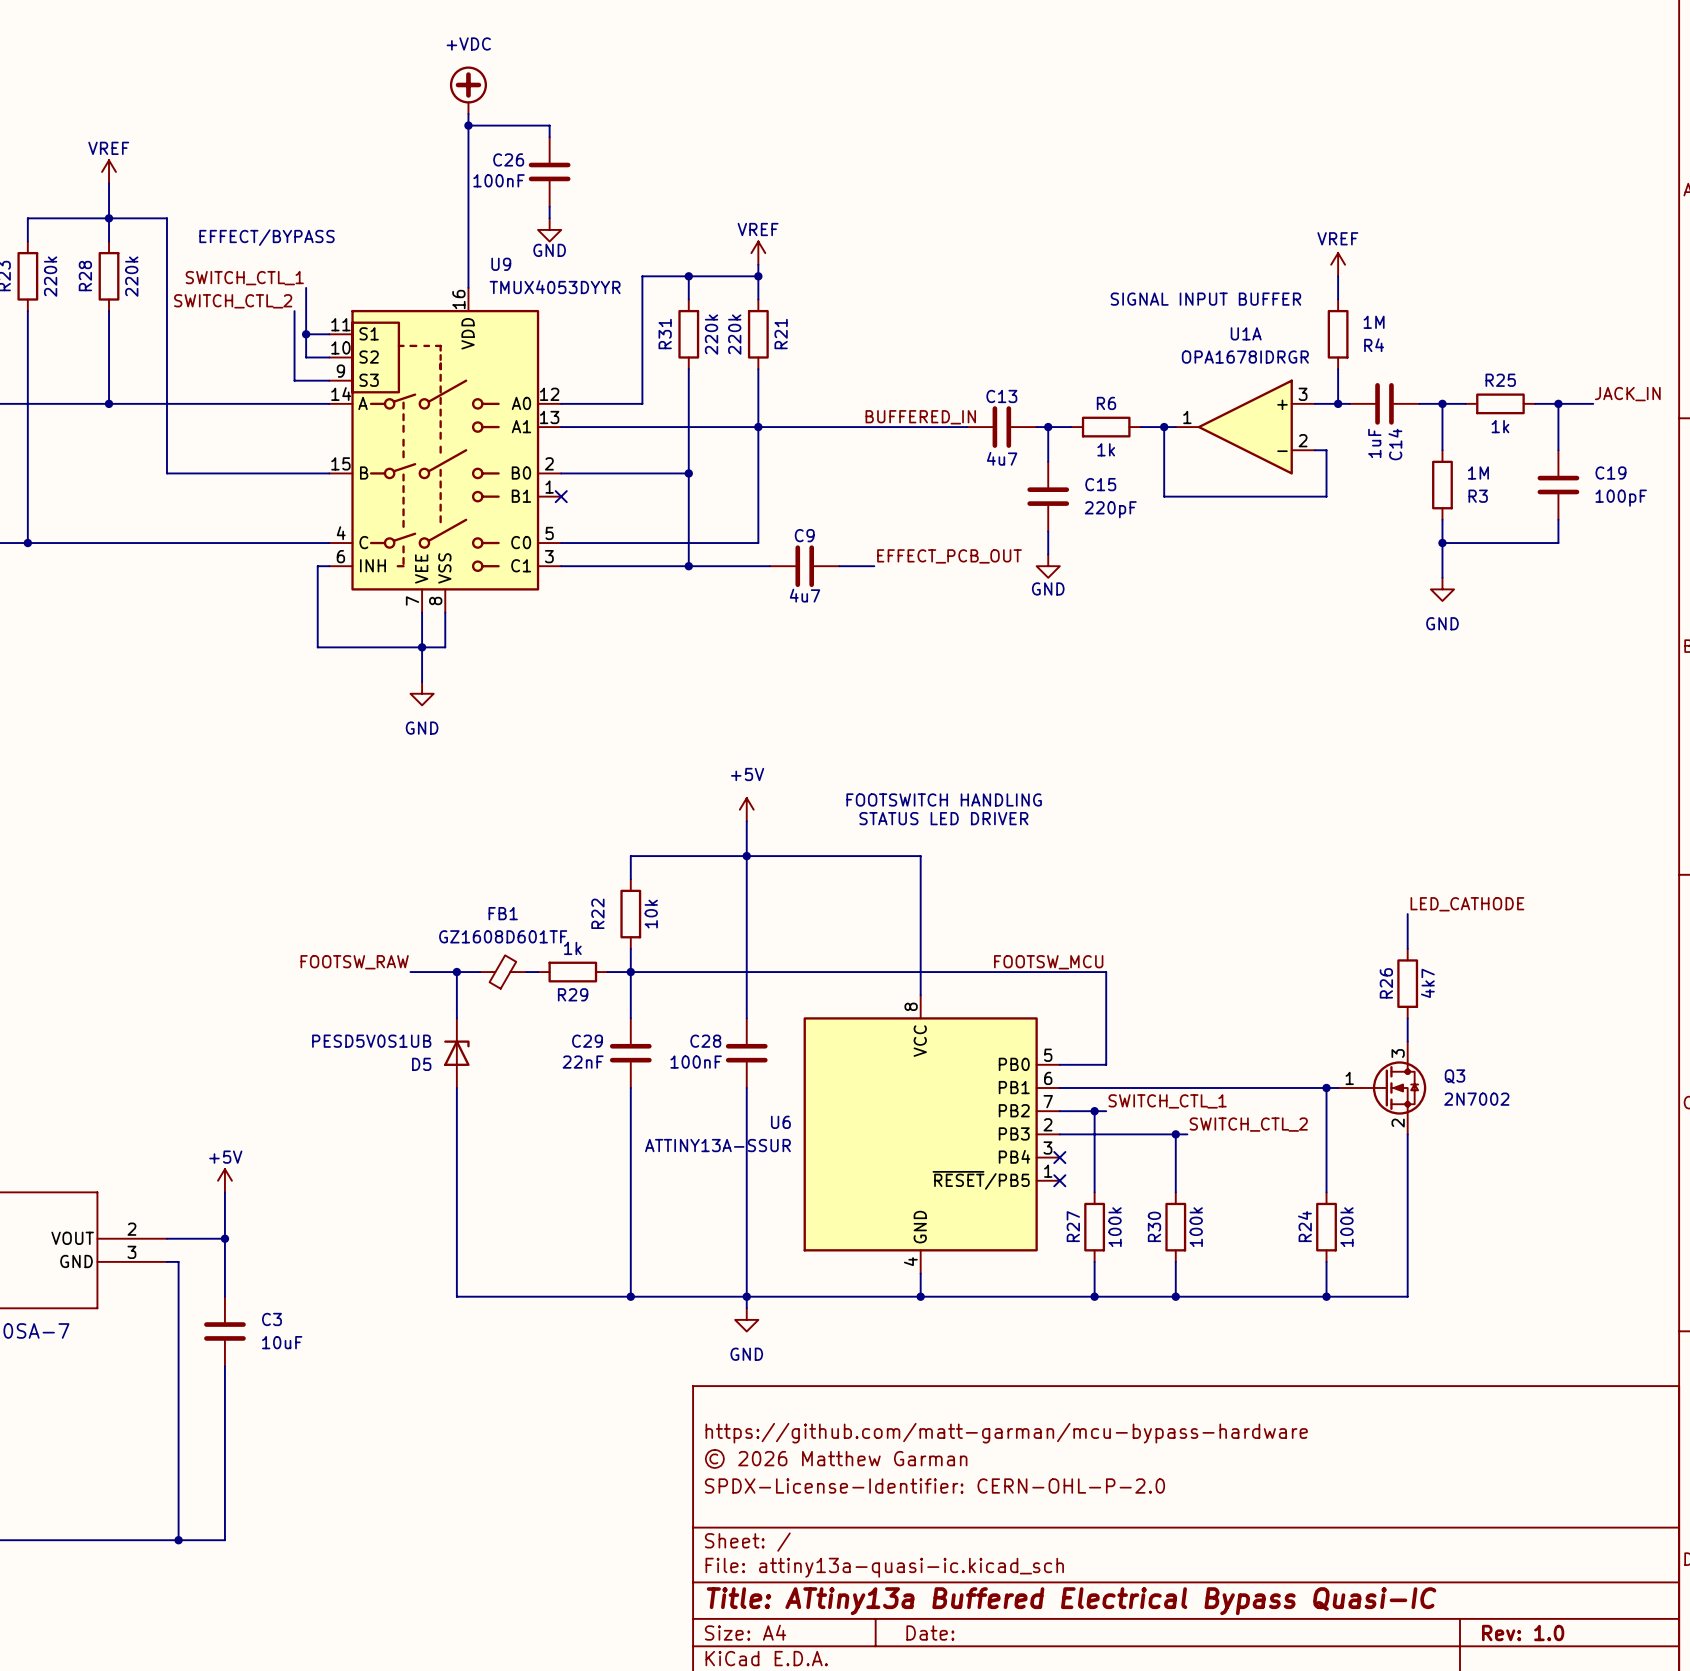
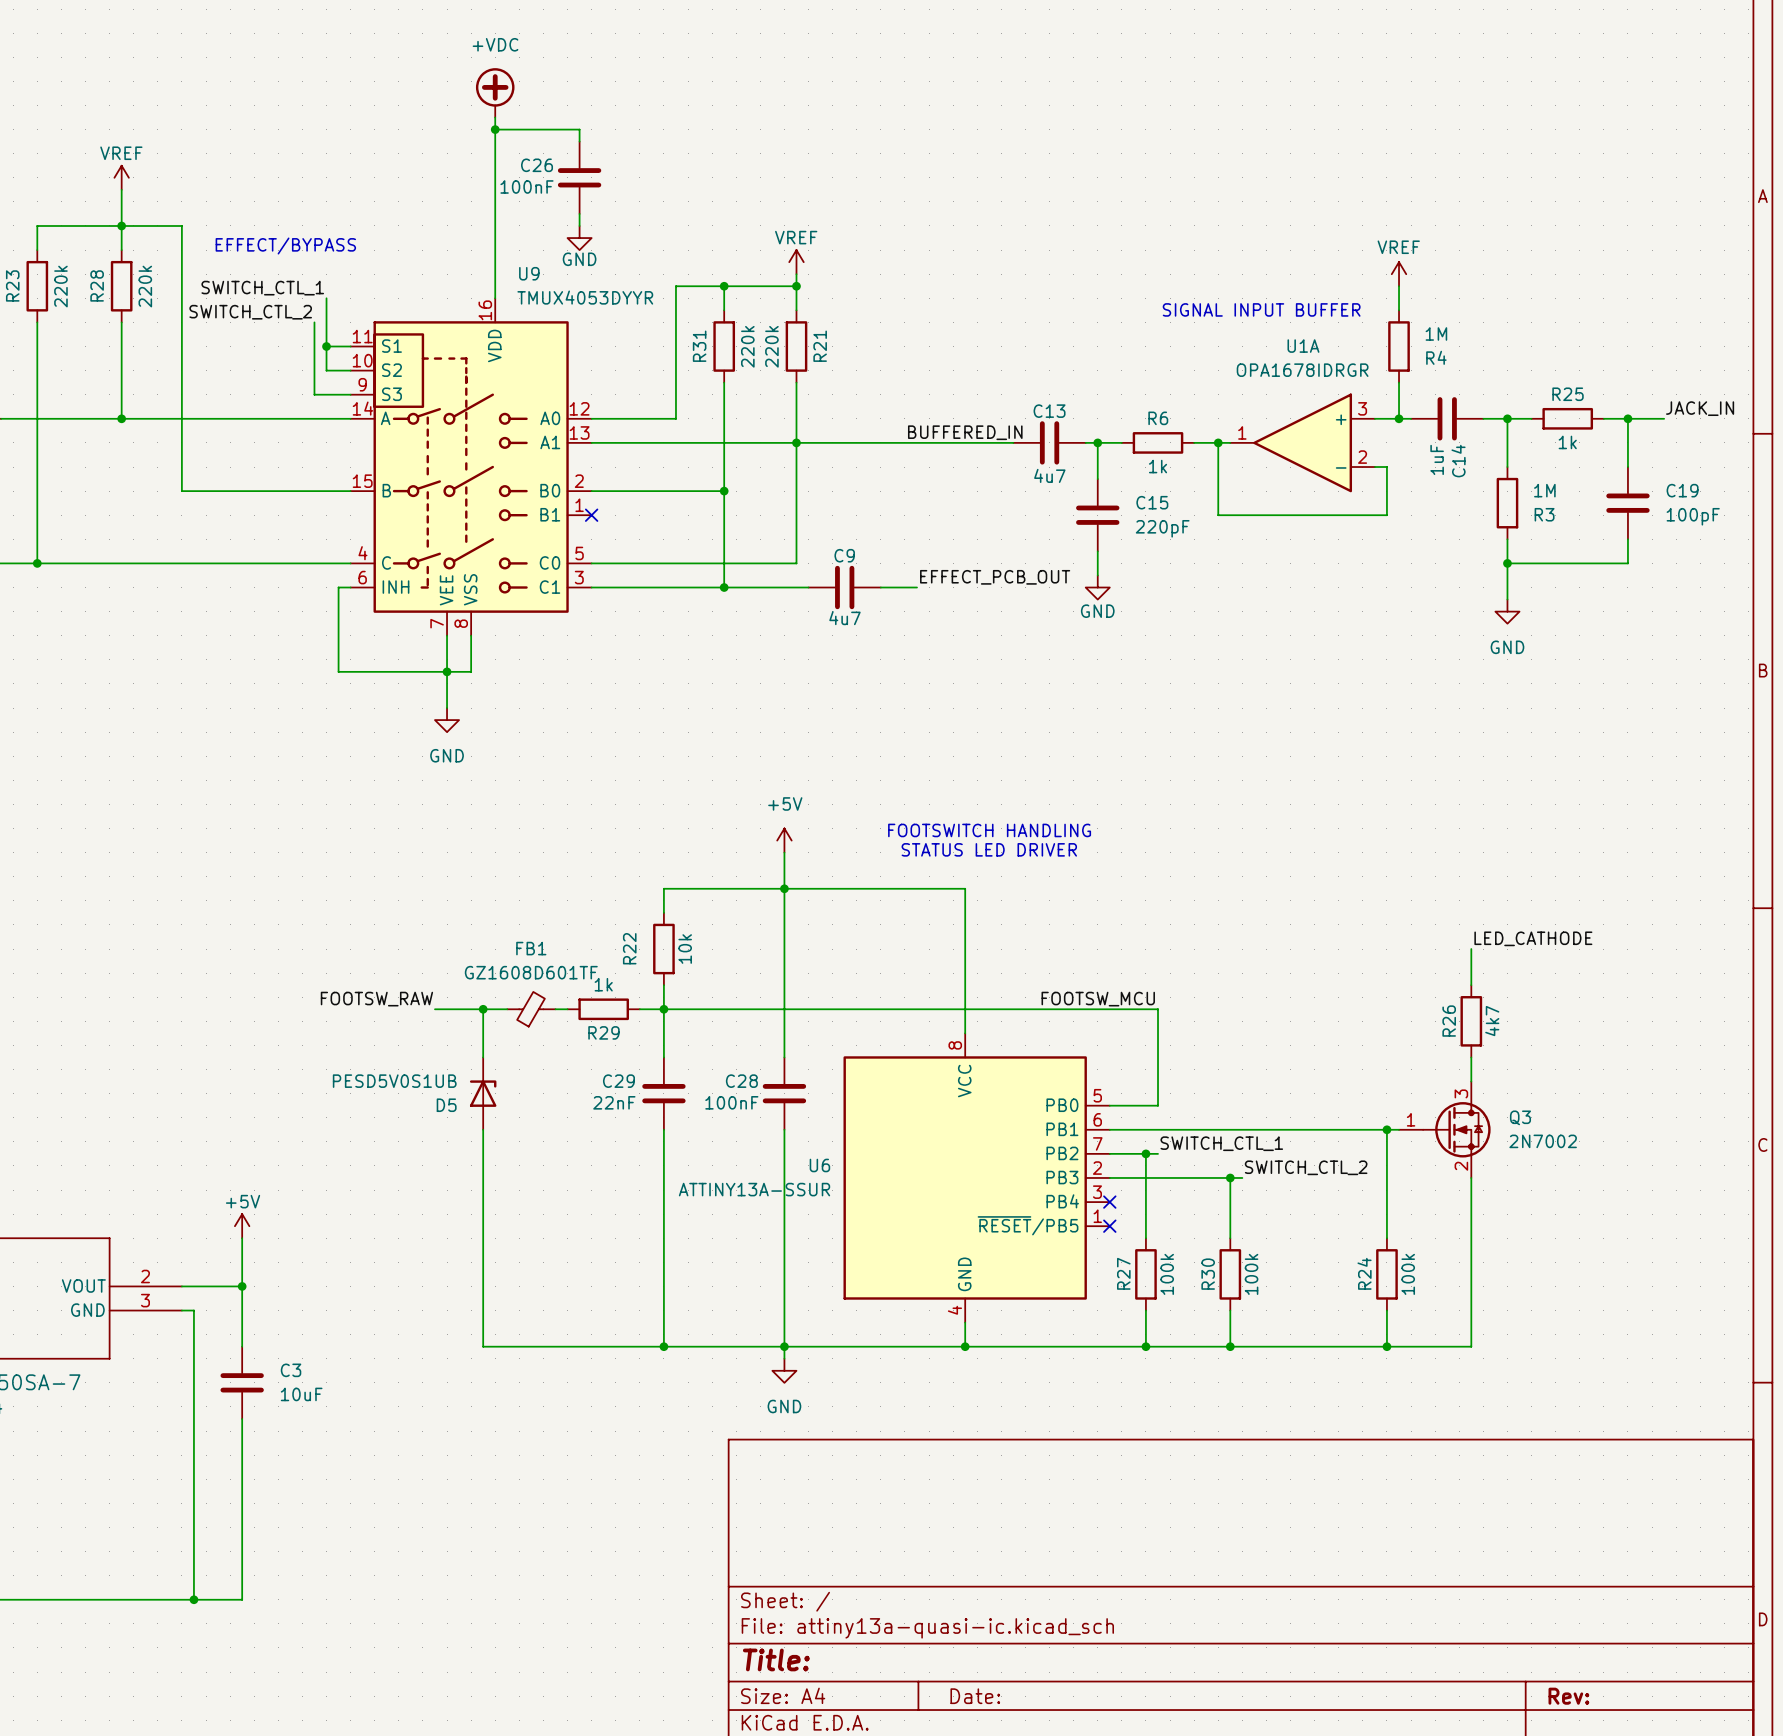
title block: https://github.com/matt-garman/mcu-bypass-hardware (1006, 1433) -> none
title block: © 2026 Matthew Garman (836, 1458) -> none
title block: SPDX-License-Identifier: CERN-OHL-P-2.0 (934, 1486) -> none
title block: Title: ATtiny13a Buffered Electrical Bypass Quasi-IC (1071, 1601) -> Title: (776, 1659)
title block: Rev: 1.0 (1523, 1633) -> Rev: (1568, 1696)

